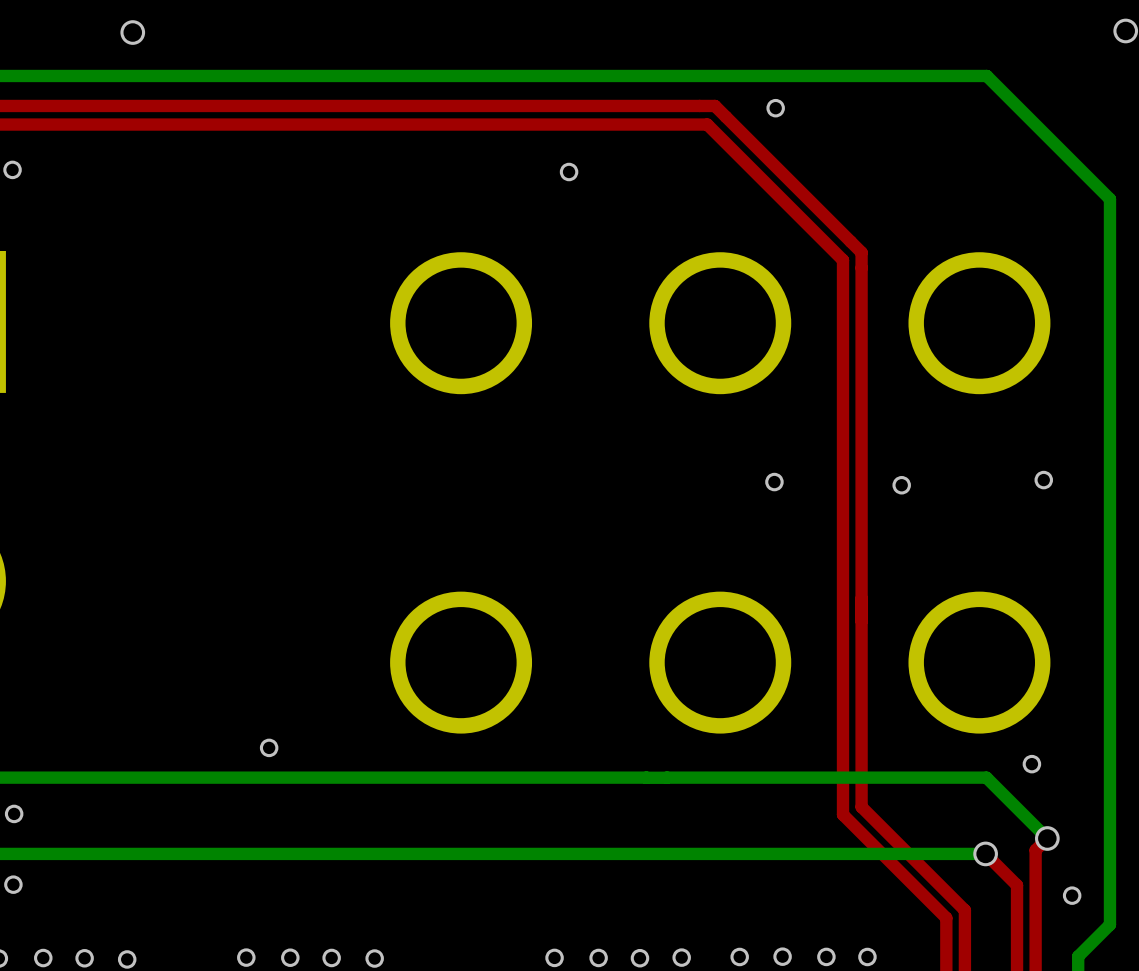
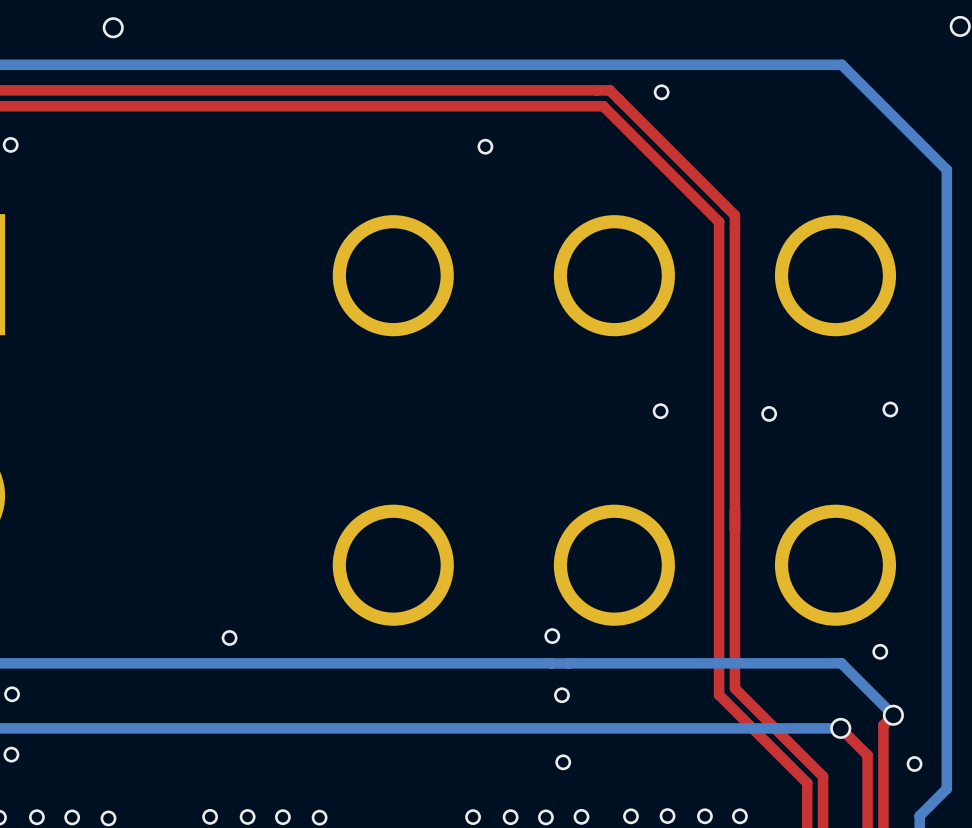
via: none -> (552, 636)
via: none -> (561, 695)
via: none -> (563, 762)

